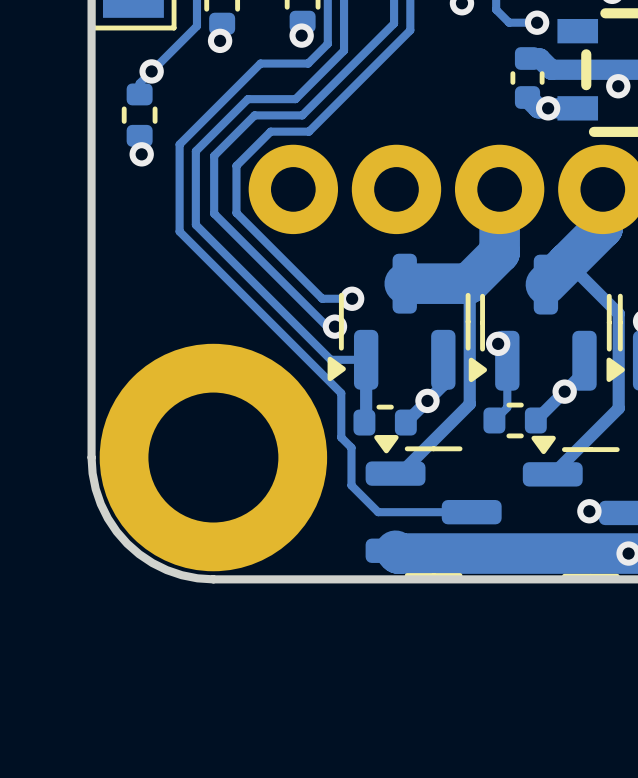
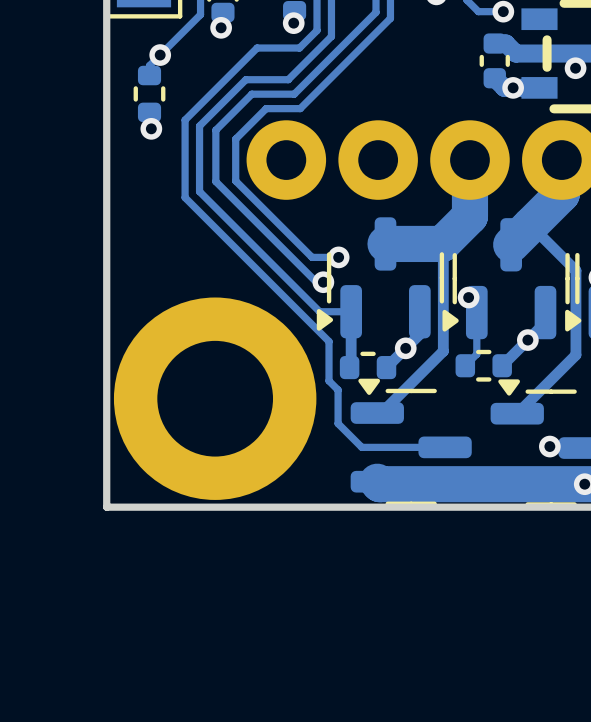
board edge: (91, 457) (95, 489) (100, 504) (116, 531) (127, 543) (139, 554) (166, 570) (197, 578) (213, 579) -> (106, 398) (106, 507) (215, 507)

